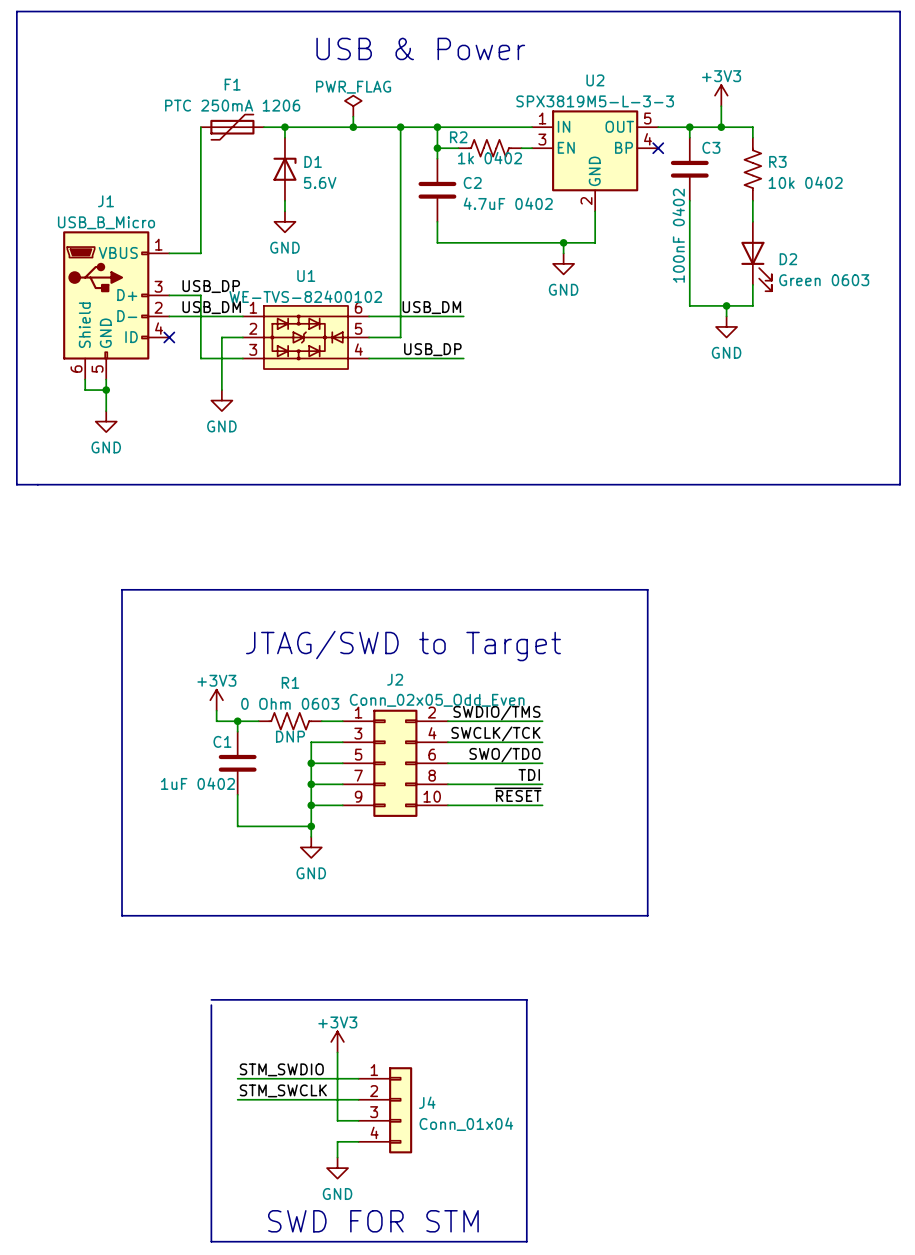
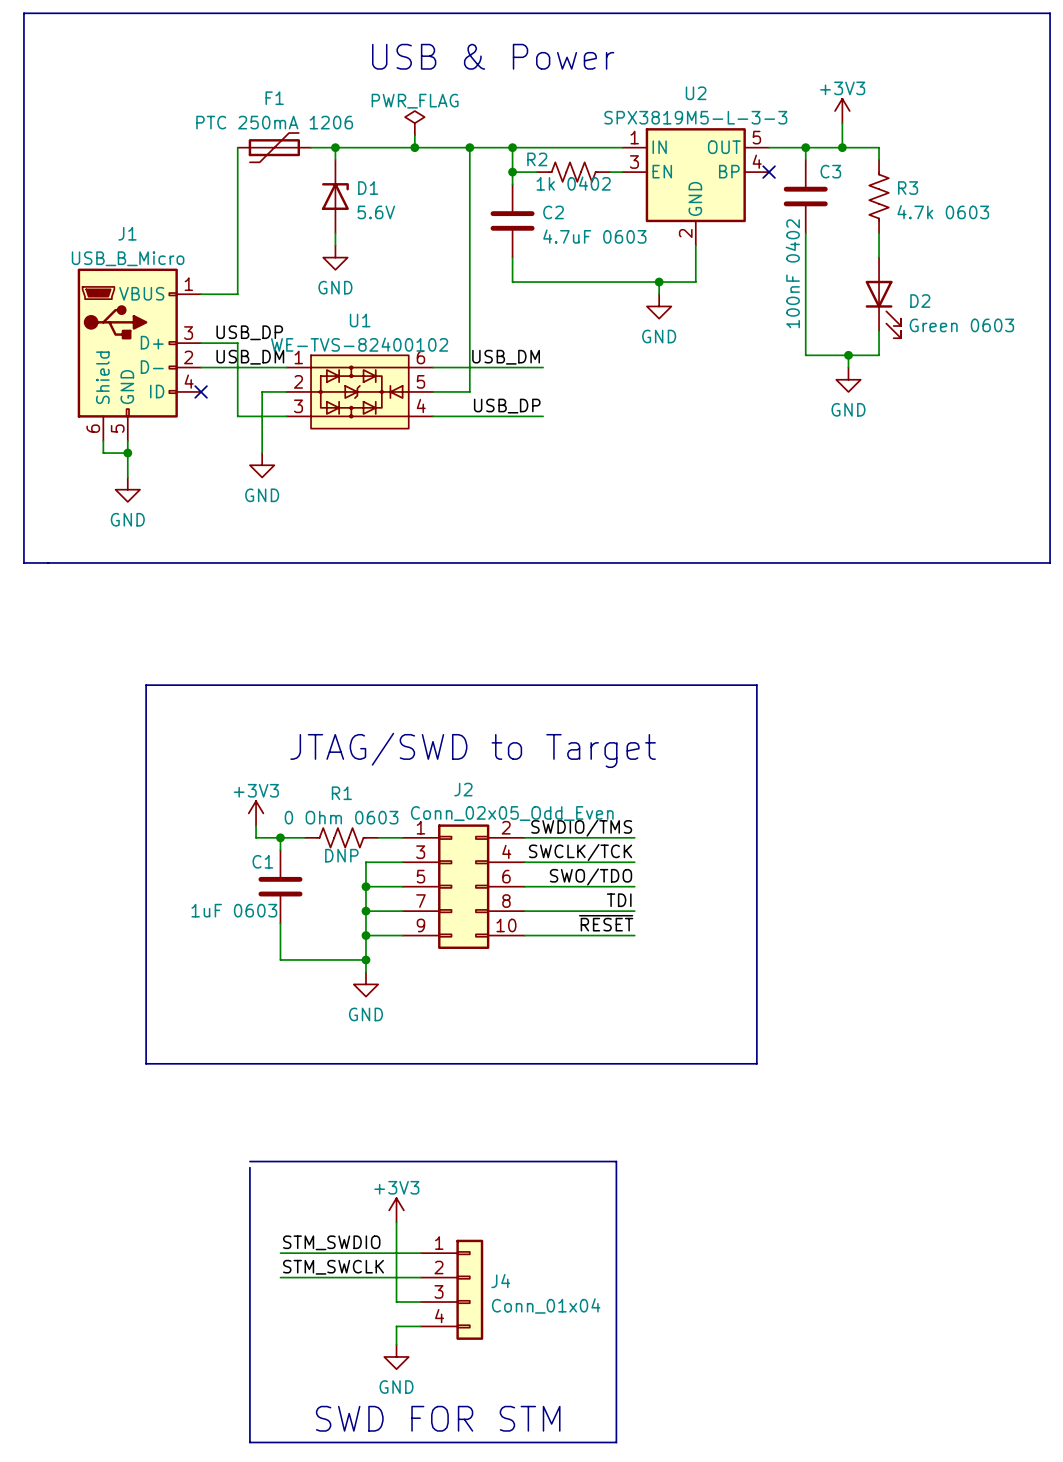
R3 value: 10k 0402 (805, 182) -> 4.7k 0603 (943, 212)
C2 value: 4.7uF 0402 (508, 203) -> 4.7uF 0603 (594, 236)
C1 value: 1uF 0402 (197, 783) -> 1uF 0603 (234, 910)

